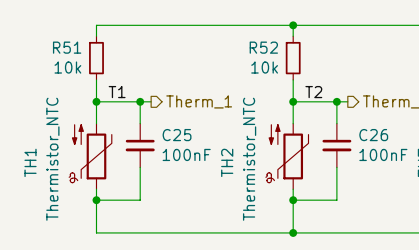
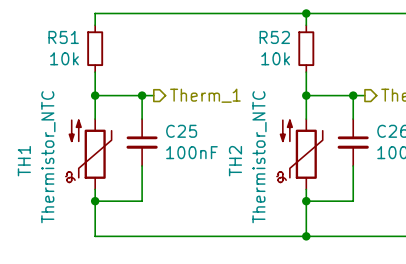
label: T1 (117, 92) -> none
label: T2 (313, 92) -> none

